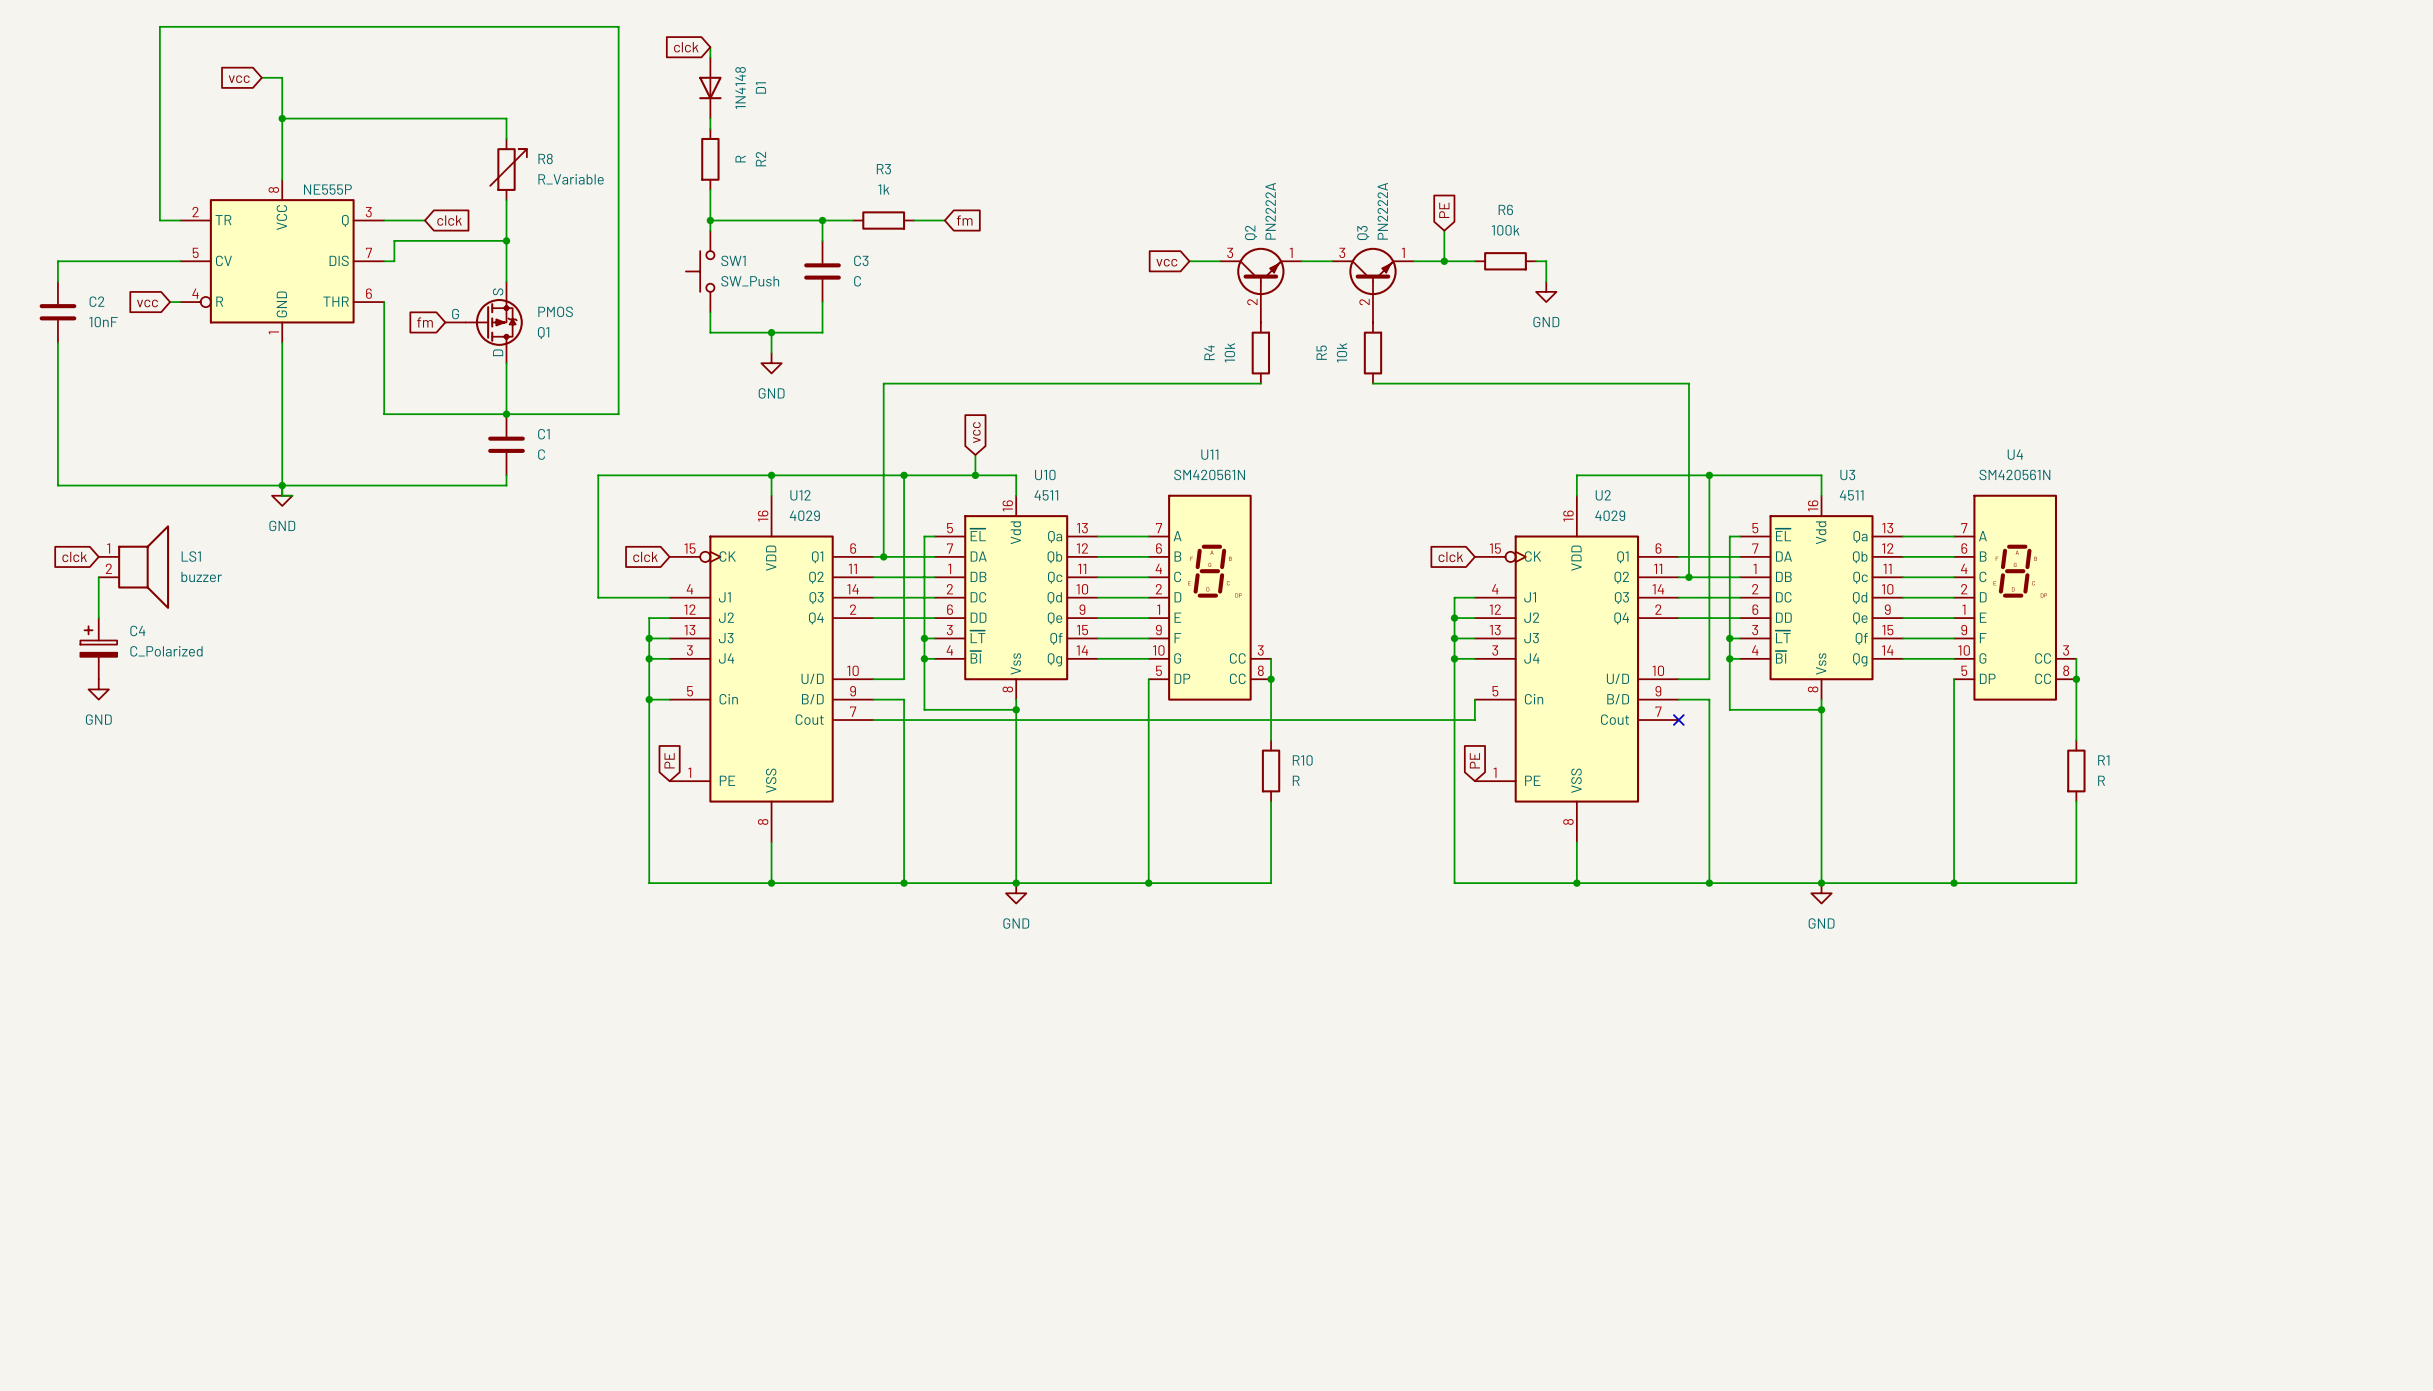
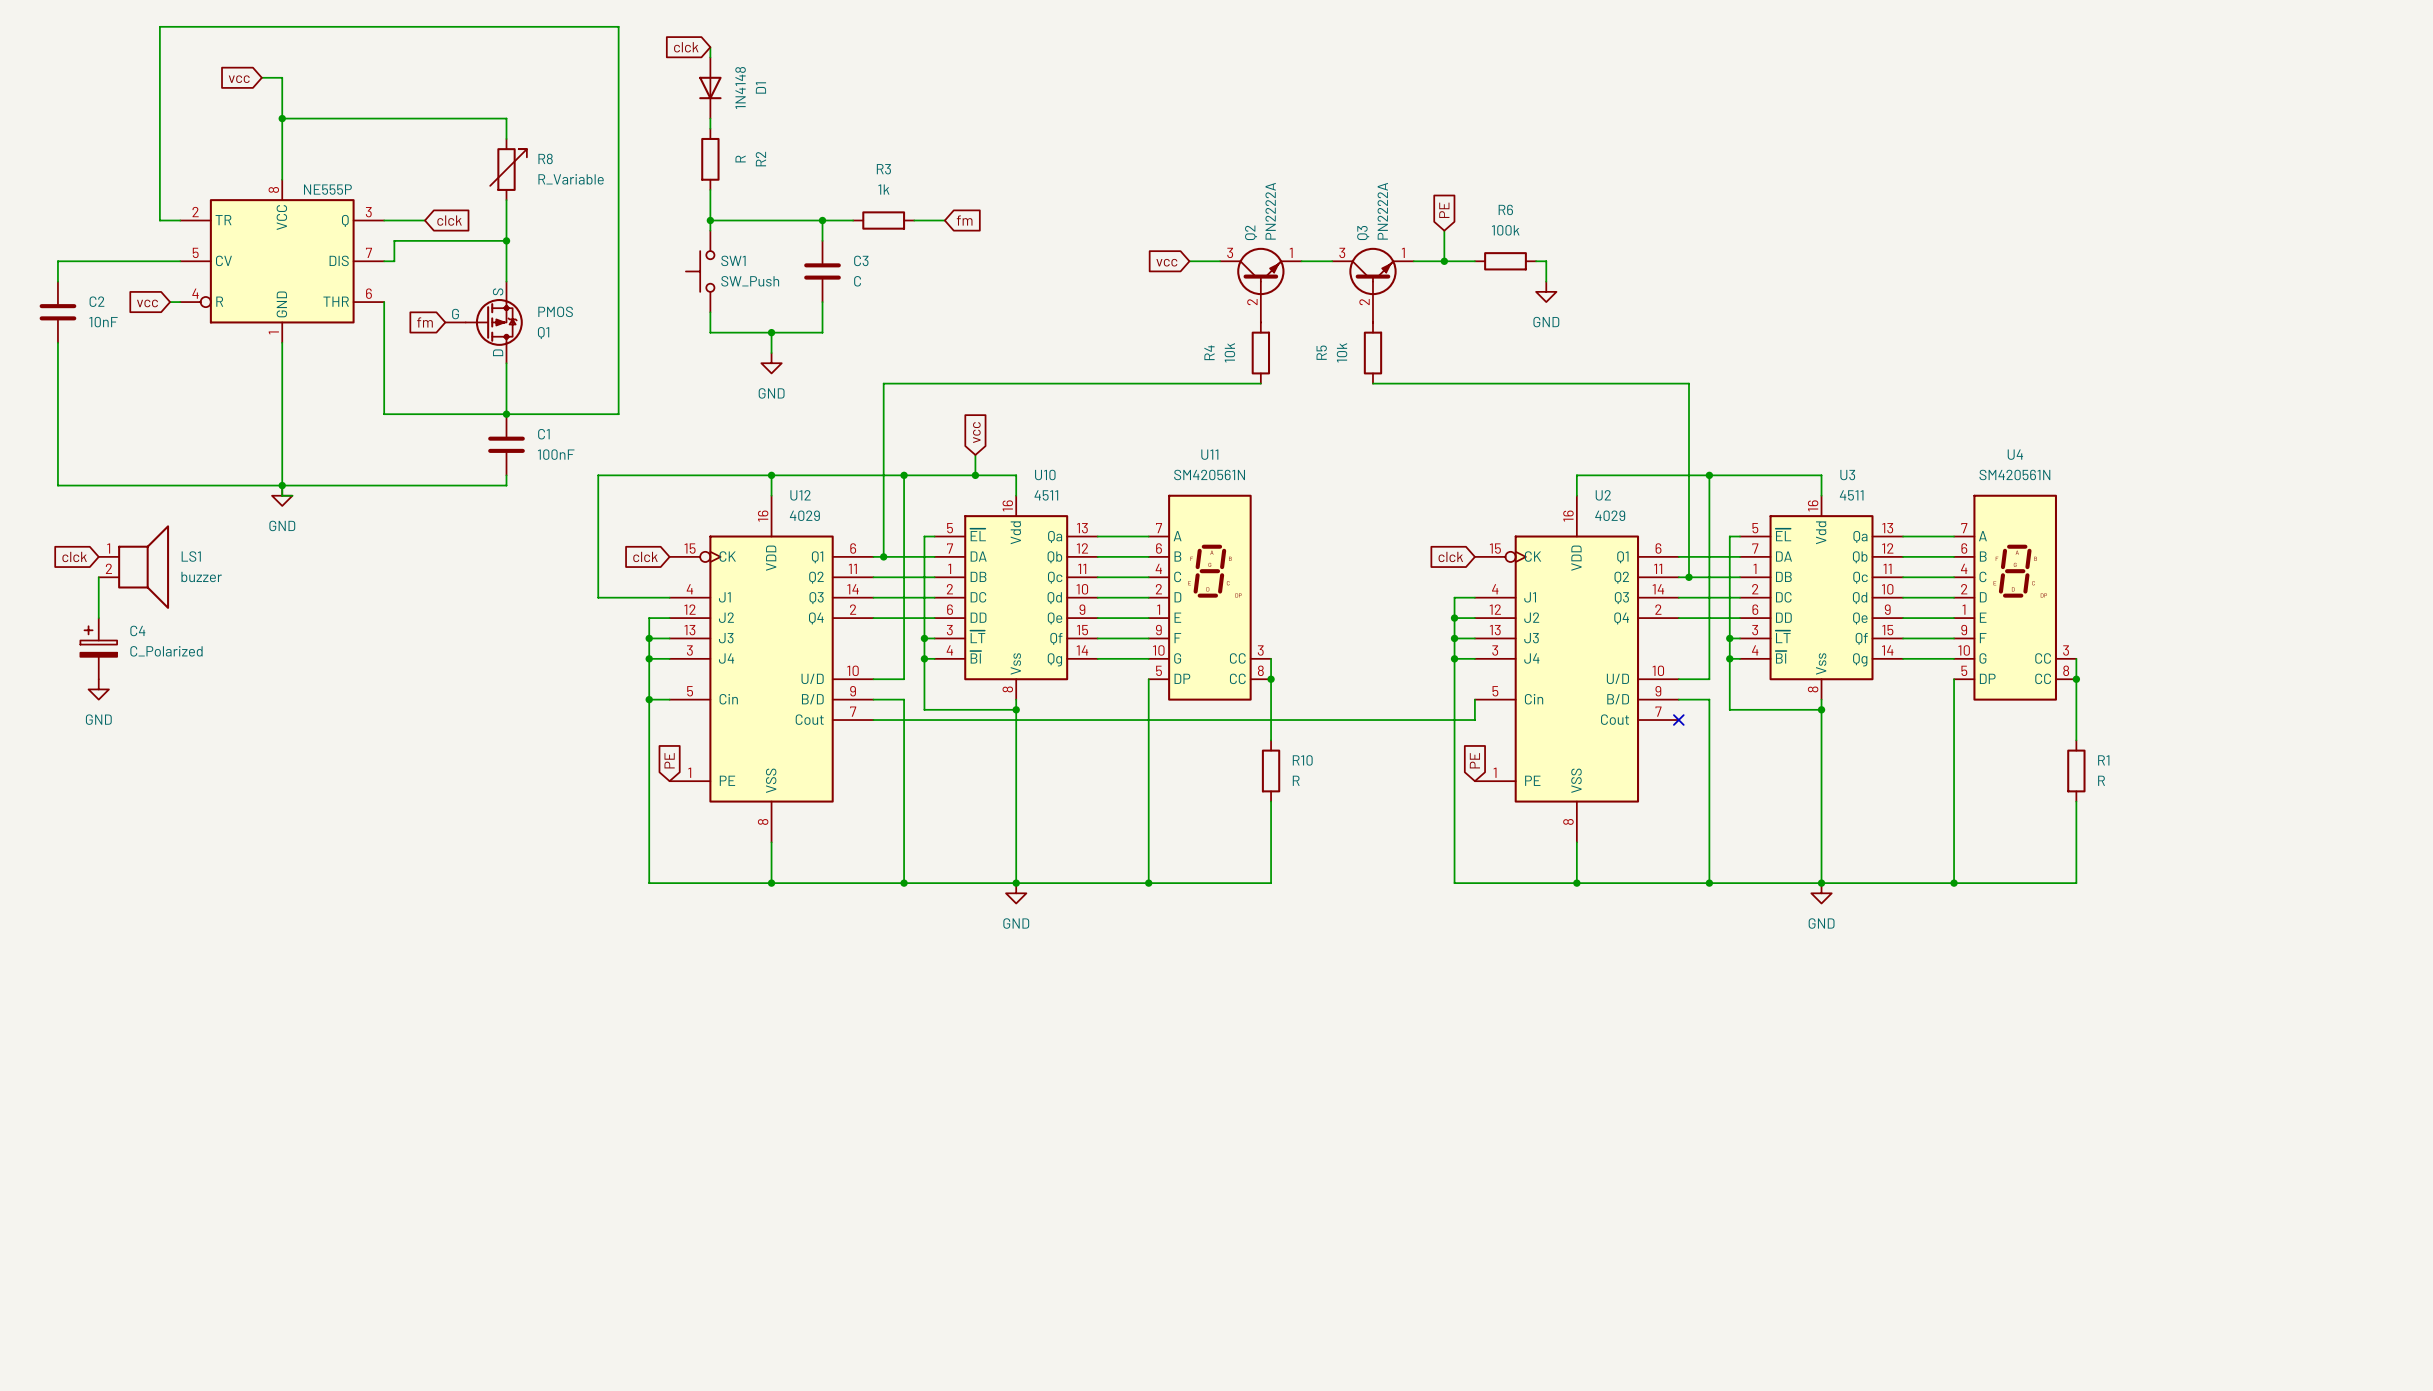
C1 value: C (541, 454) -> 100nF (556, 454)

